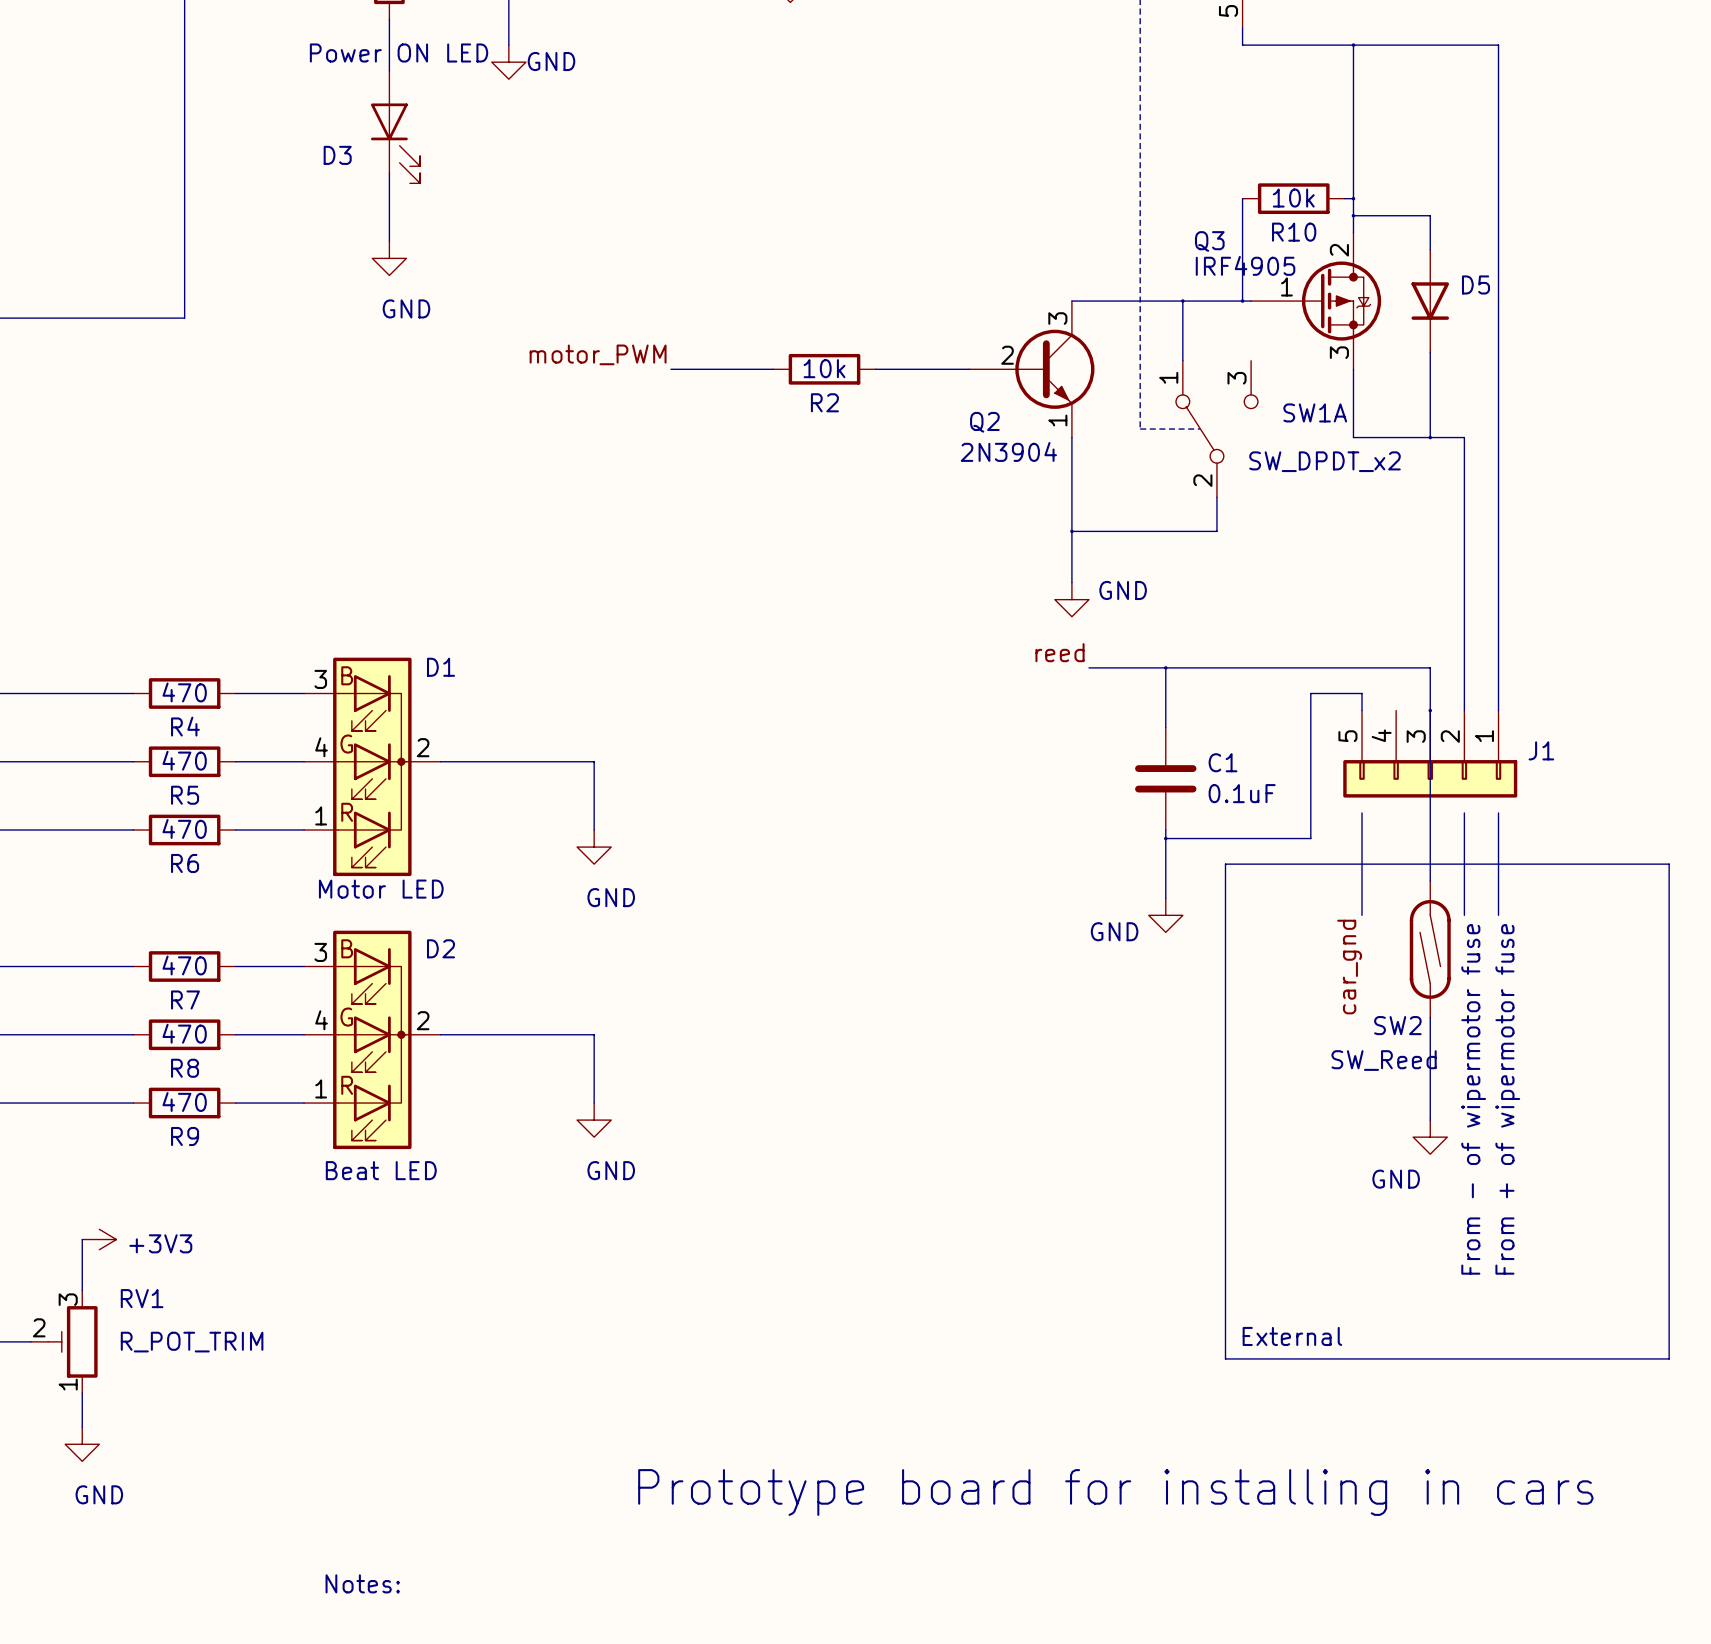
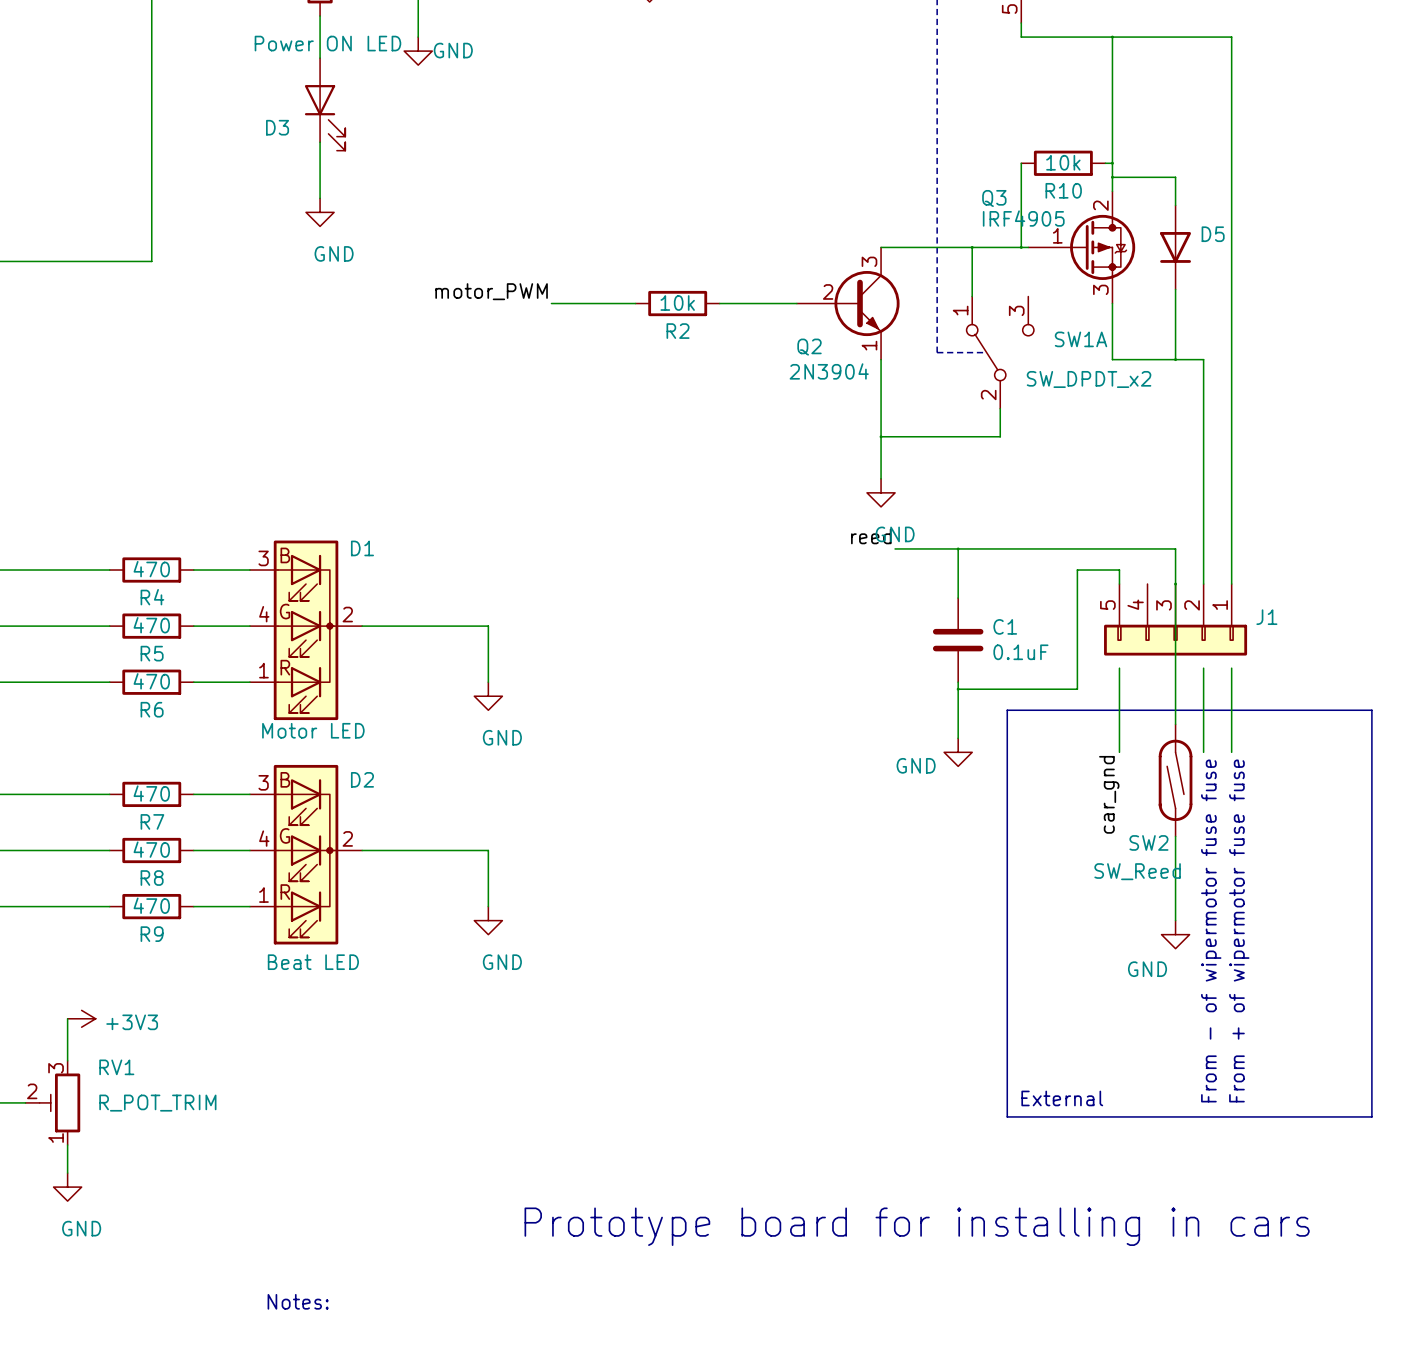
power symbol text position: GND (1123, 590) -> GND (895, 534)
text: From - of wipermotor fuse (1473, 1099) -> From - of wipermotor fuse fuse (1211, 930)
text: From + of wipermotor fuse (1507, 1099) -> From + of wipermotor fuse fuse (1239, 930)

